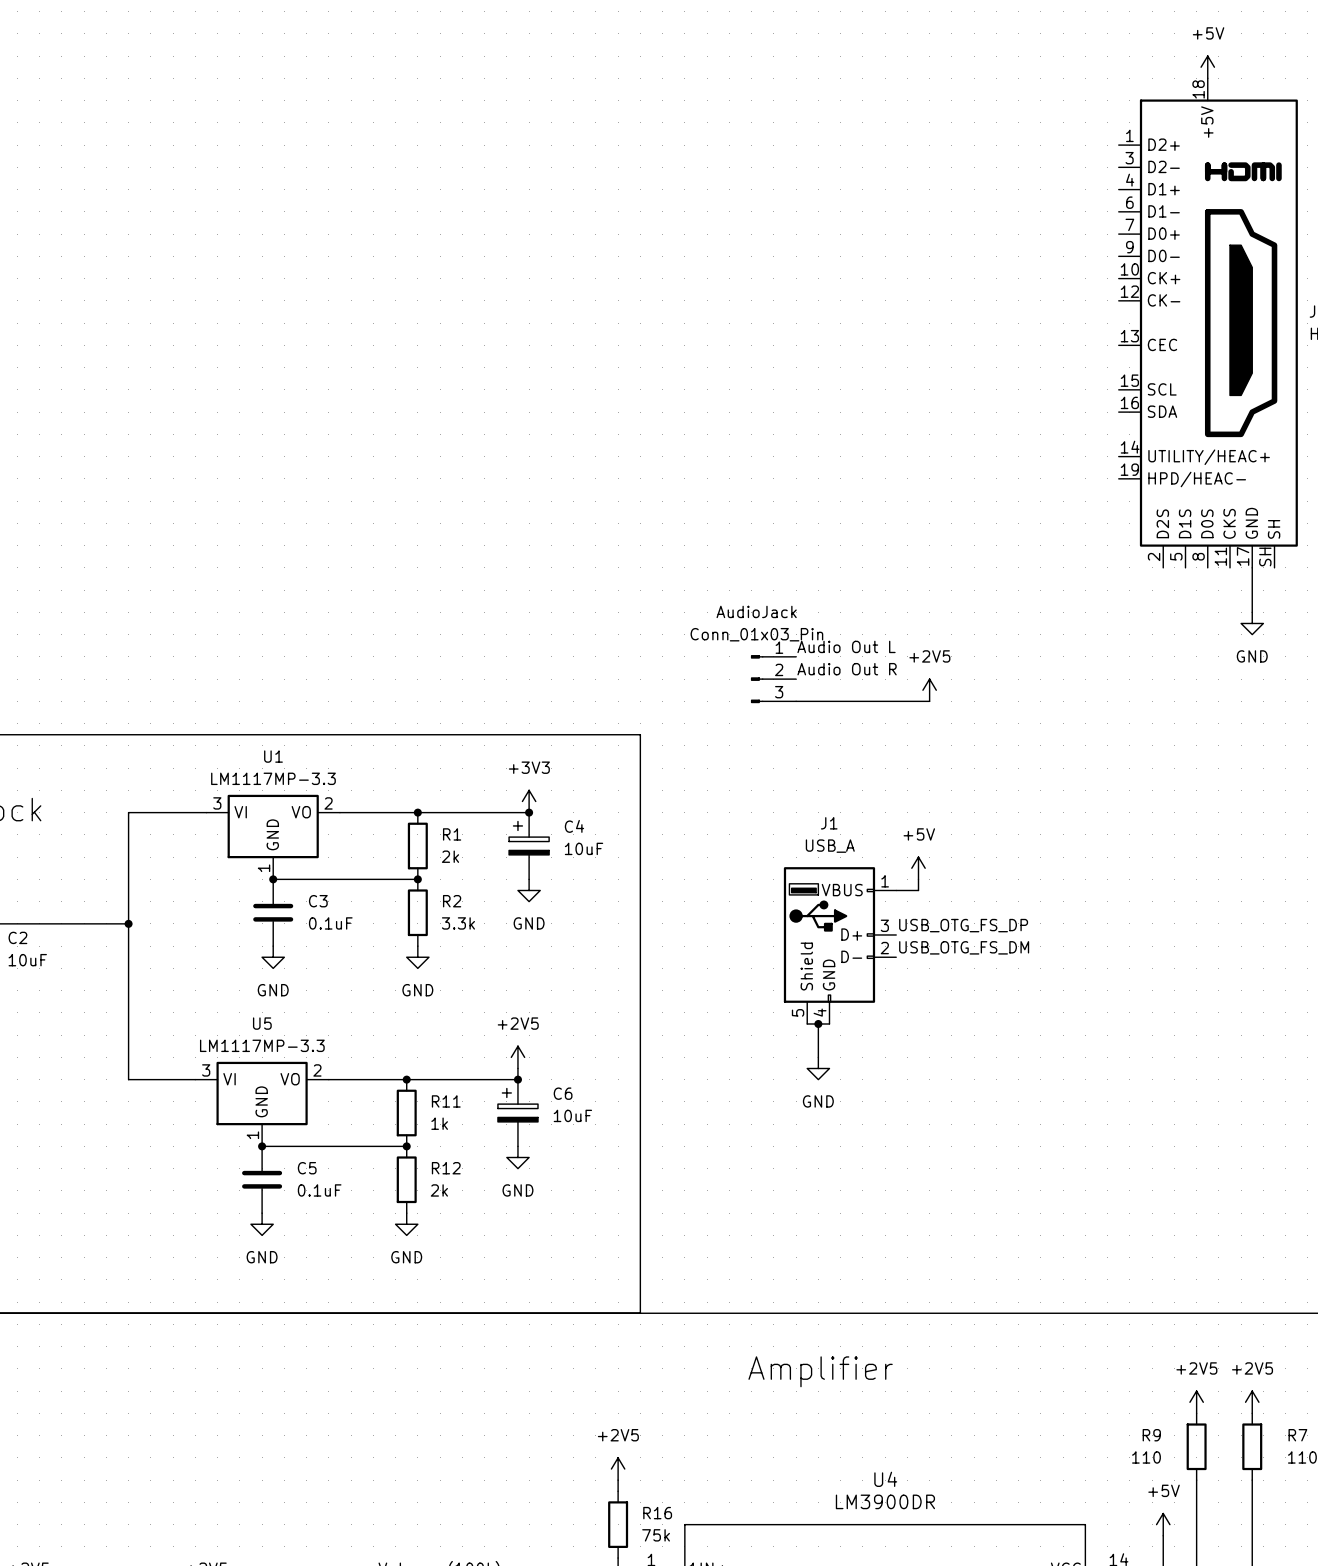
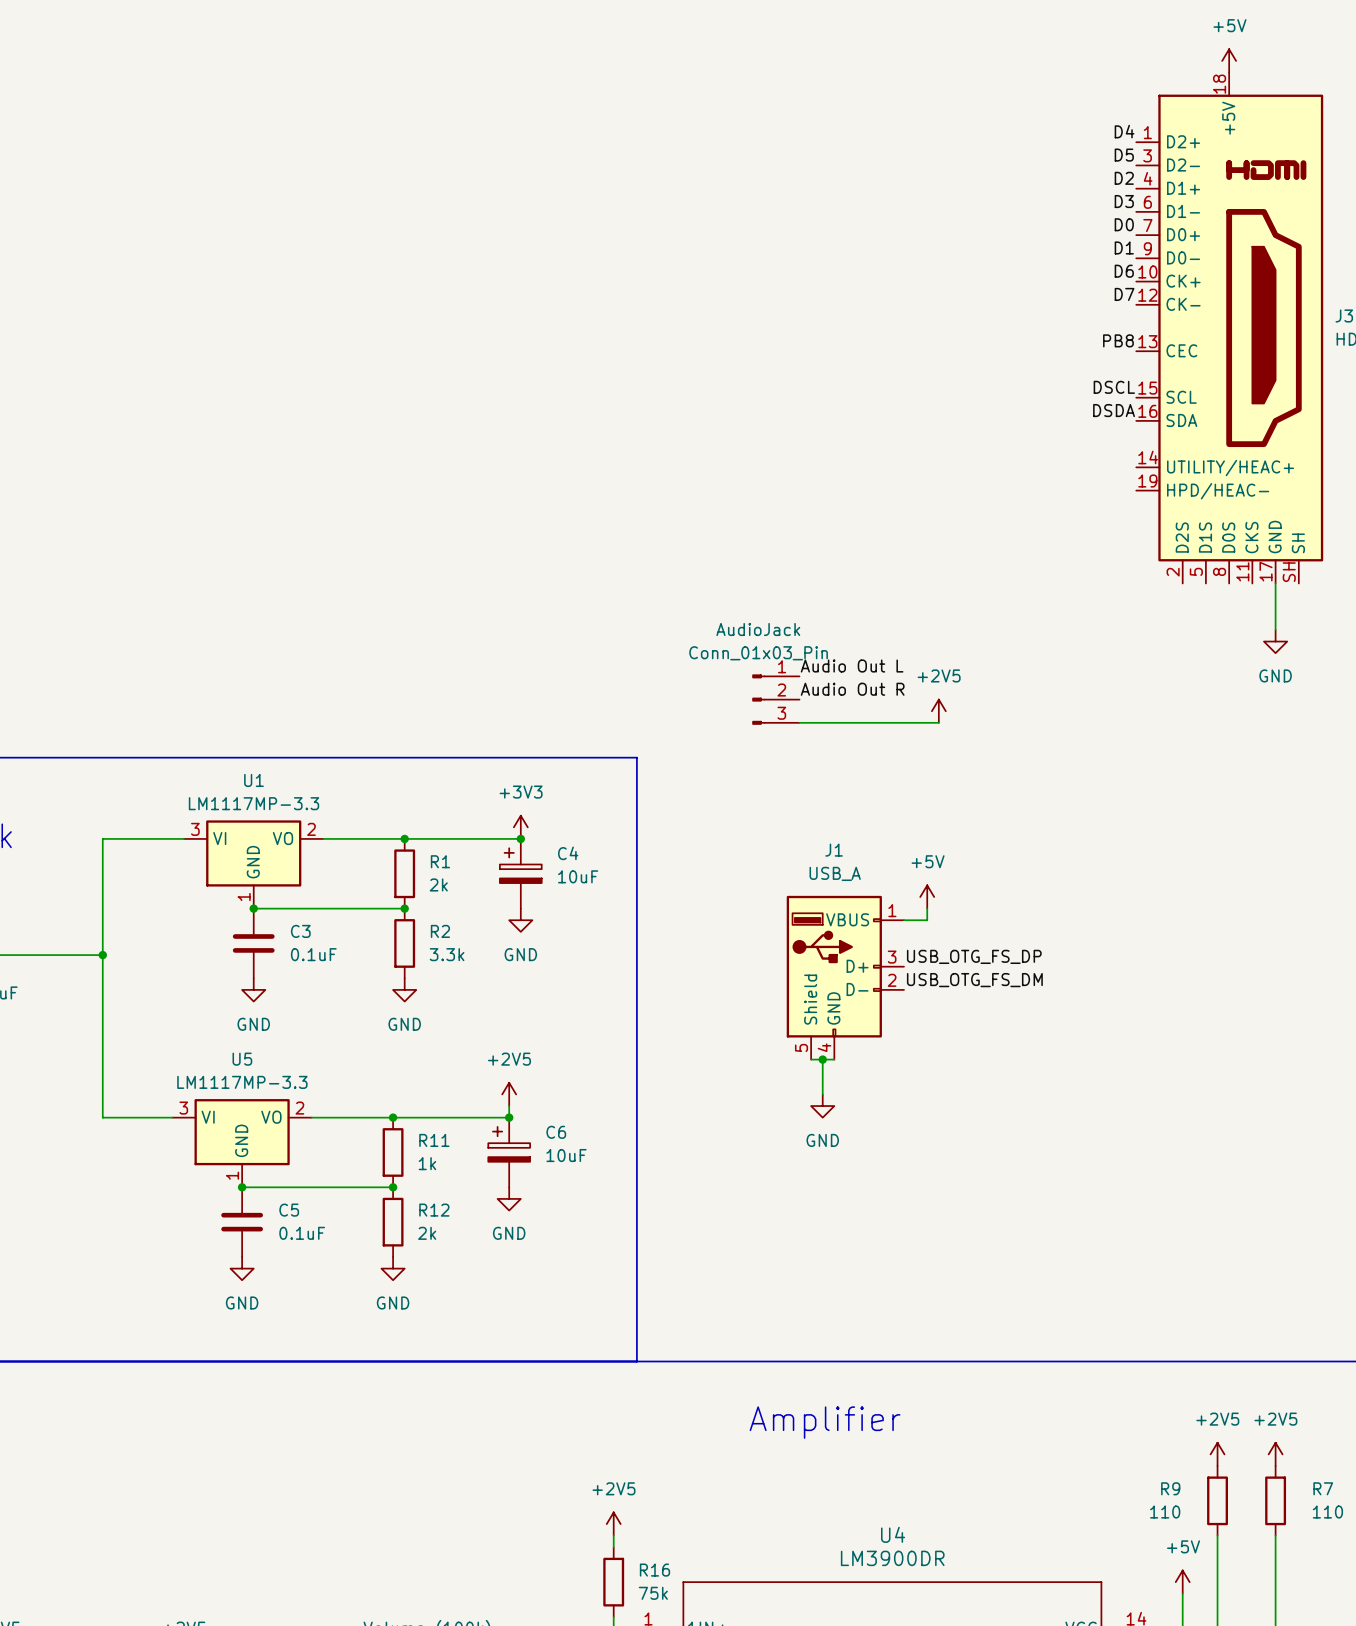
label: none -> D4 (1124, 131)
label: none -> D5 (1124, 155)
label: none -> D2 (1124, 178)
label: none -> D3 (1124, 201)
label: none -> D0 (1124, 224)
label: none -> D1 (1124, 247)
label: none -> D6 (1124, 271)
label: none -> D7 (1124, 294)
label: none -> PB8 (1118, 340)
label: none -> DSCL (1114, 387)
label: none -> DSDA (1114, 410)

